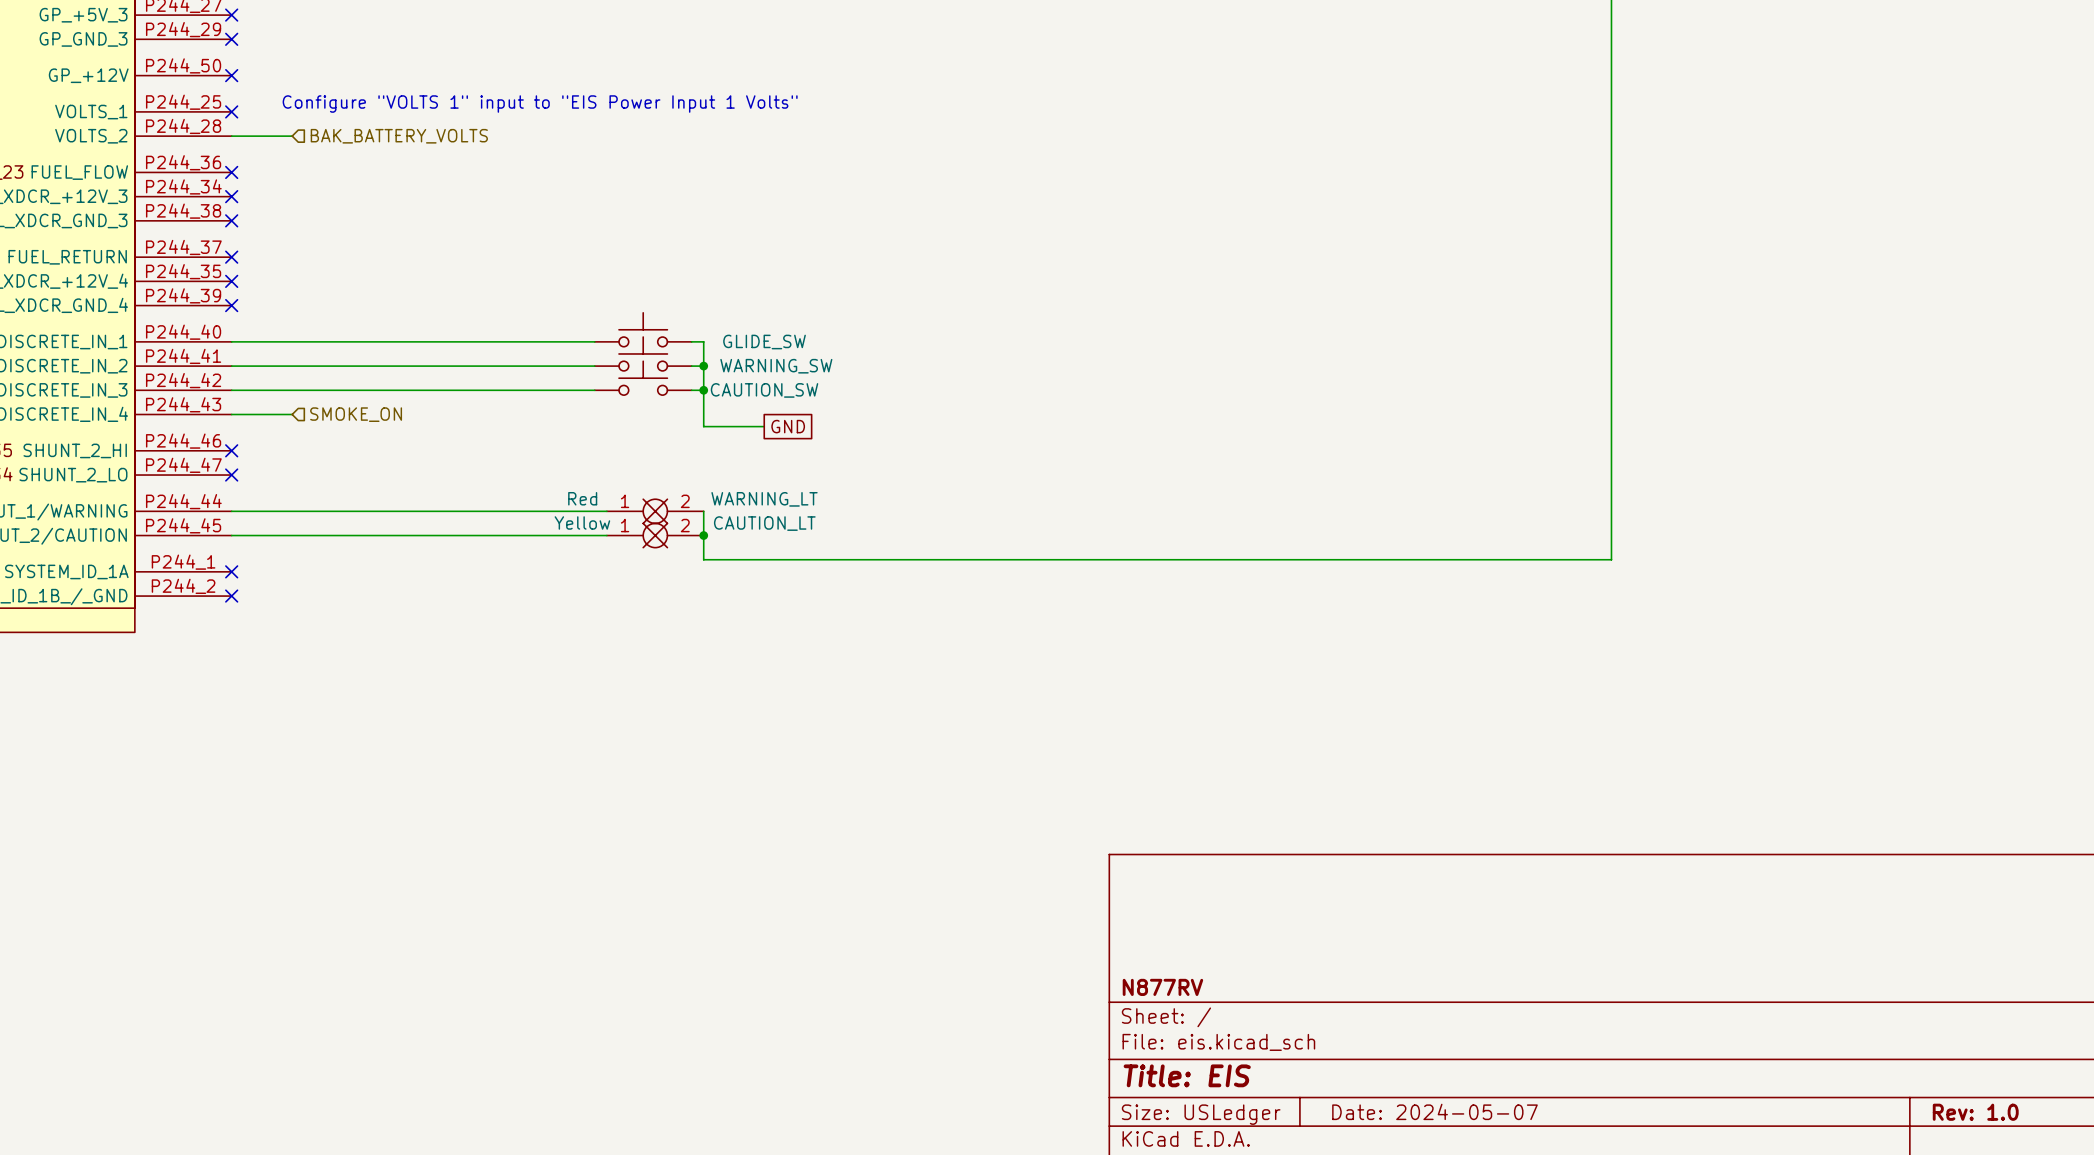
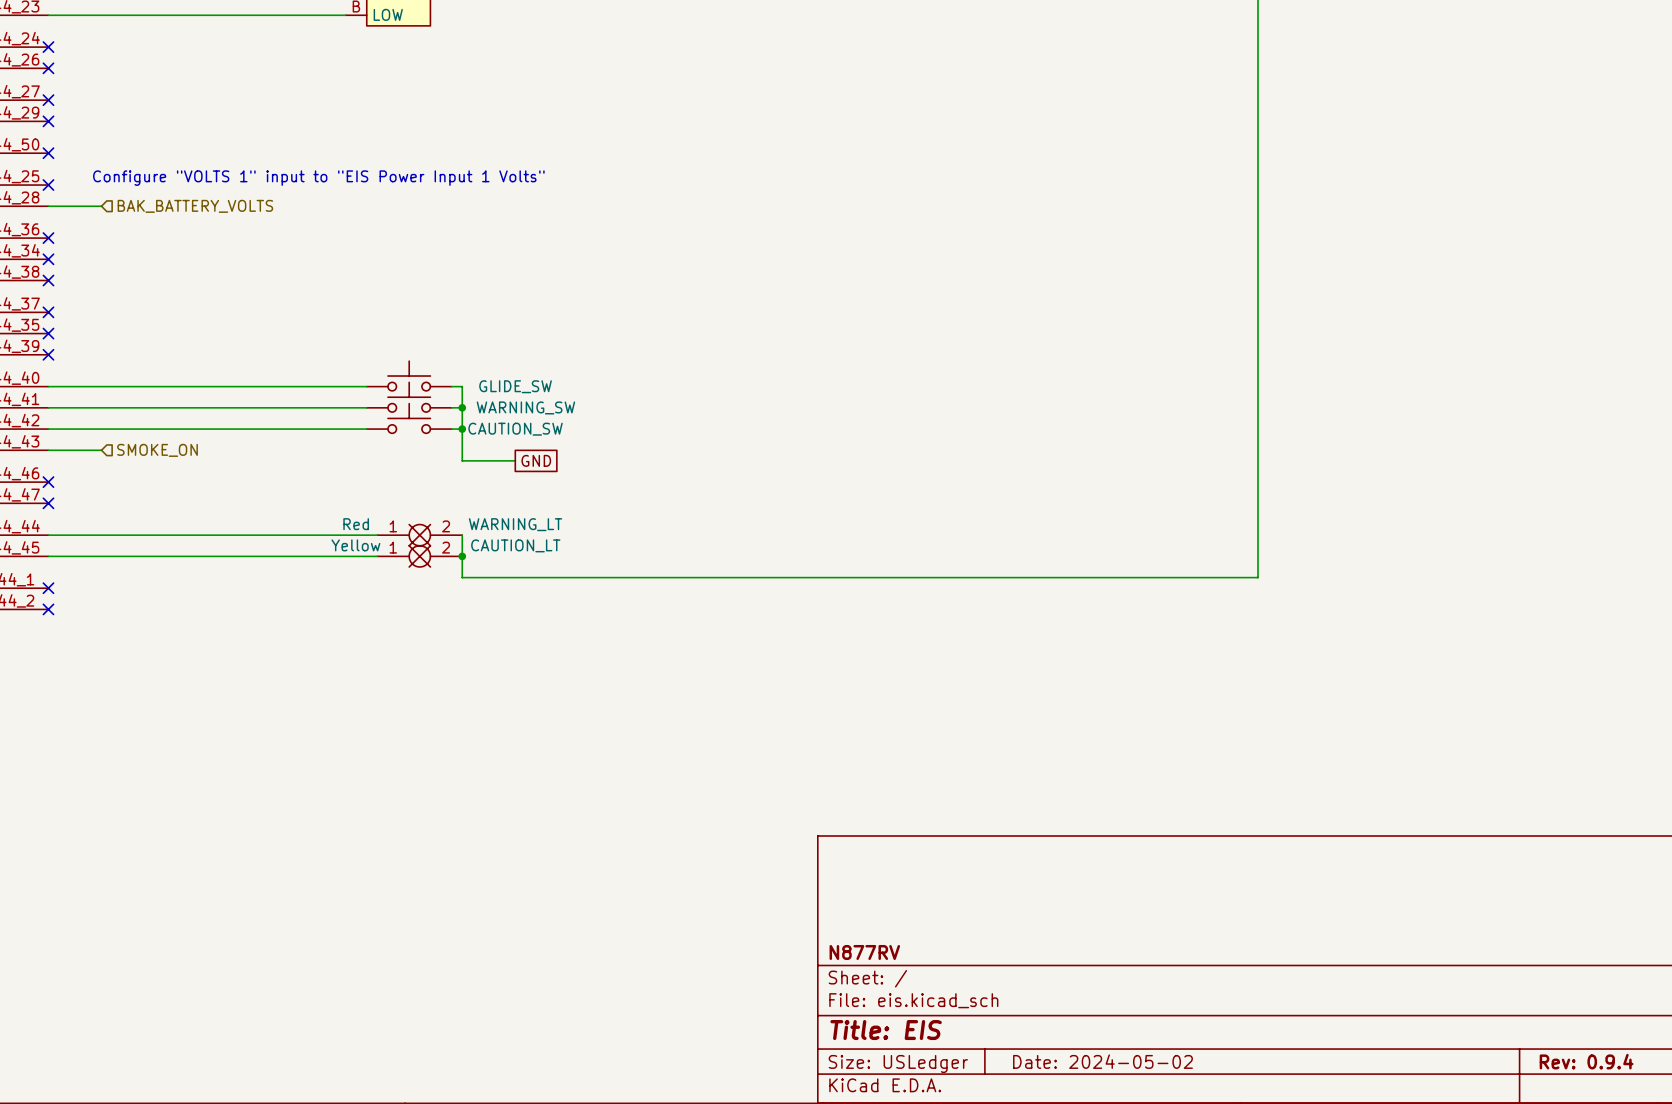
title block: Date: 2024-05-07 (1434, 1111) -> Date: 2024-05-02 (1102, 1061)
title block: Rev: 1.0 (1975, 1112) -> Rev: 0.9.4 (1586, 1061)

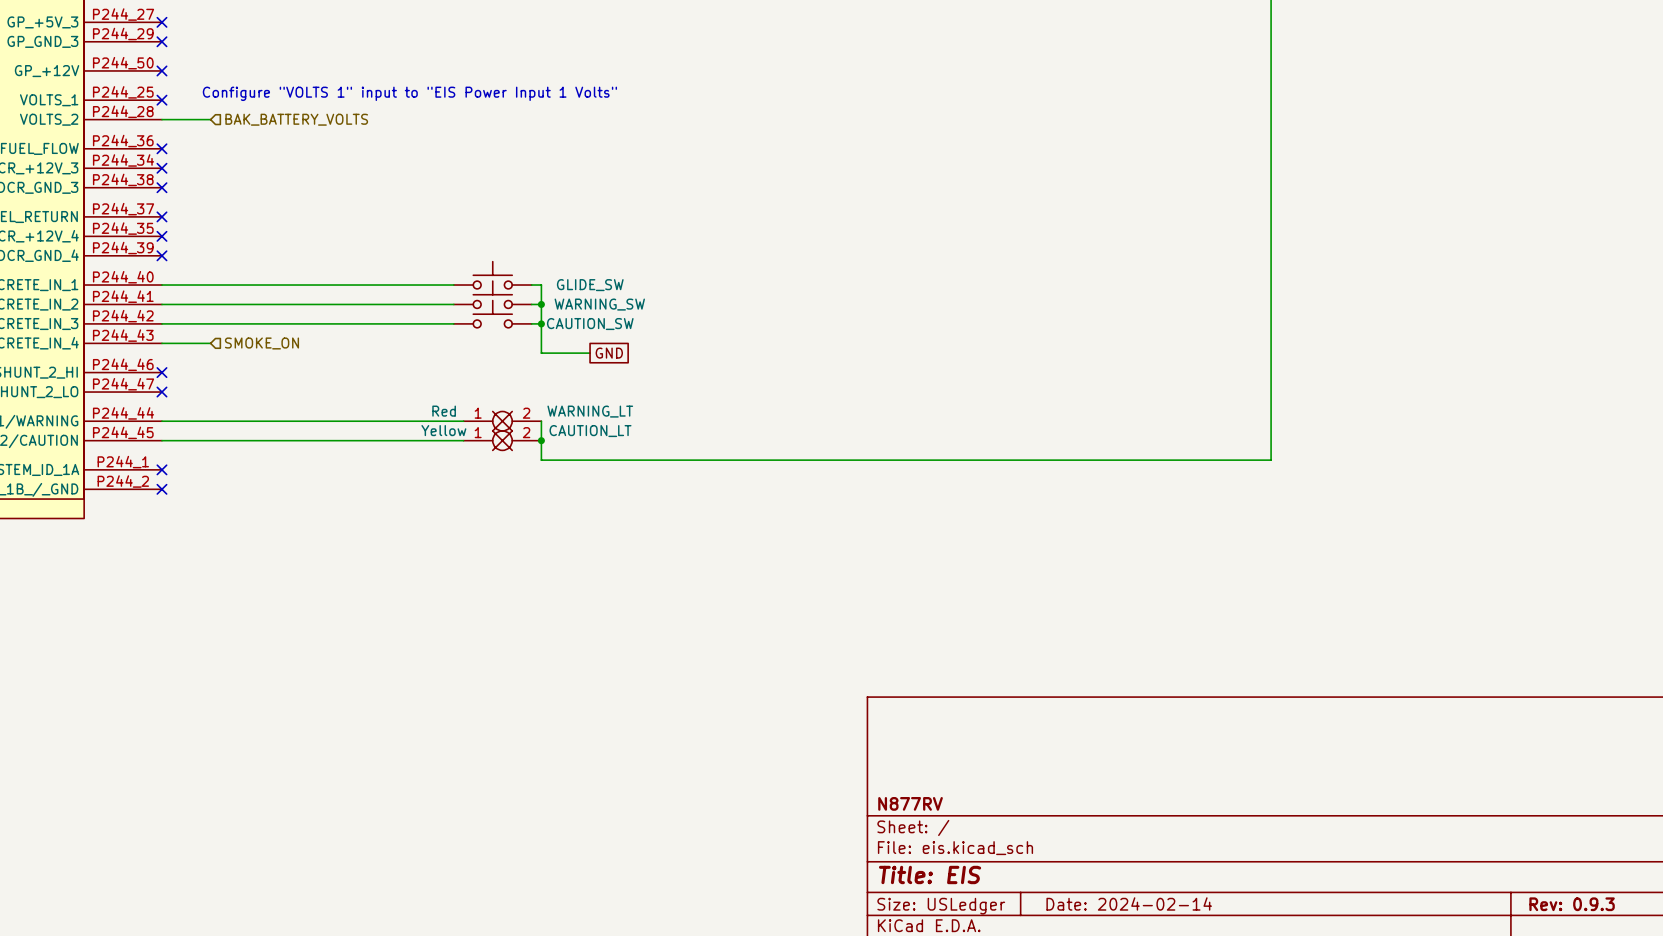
title block: Date: 2024-05-02 (1102, 1061) -> Date: 2024-02-14 (1129, 903)
title block: Rev: 0.9.4 (1586, 1061) -> Rev: 0.9.3 (1572, 904)

